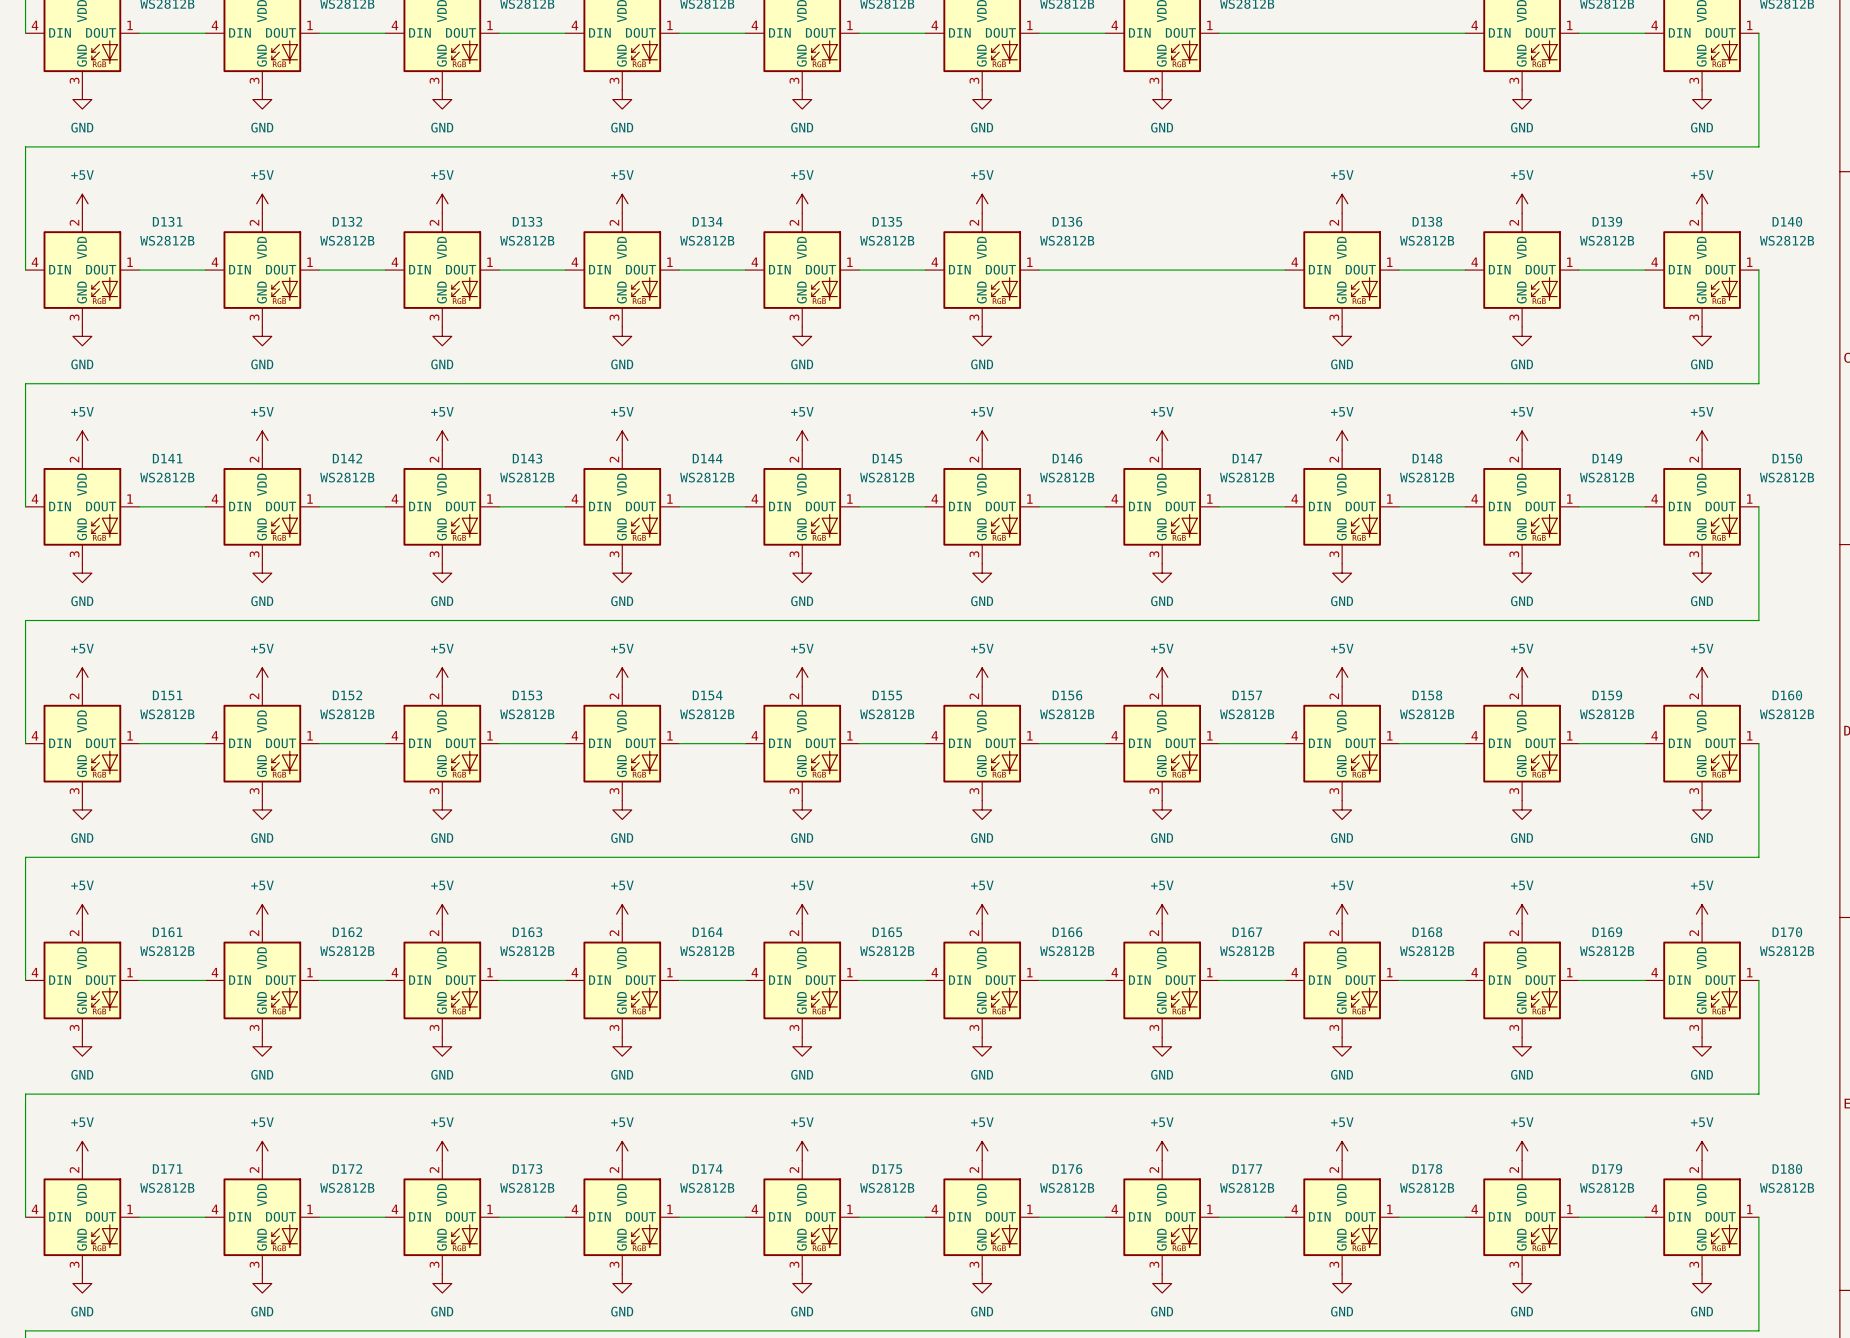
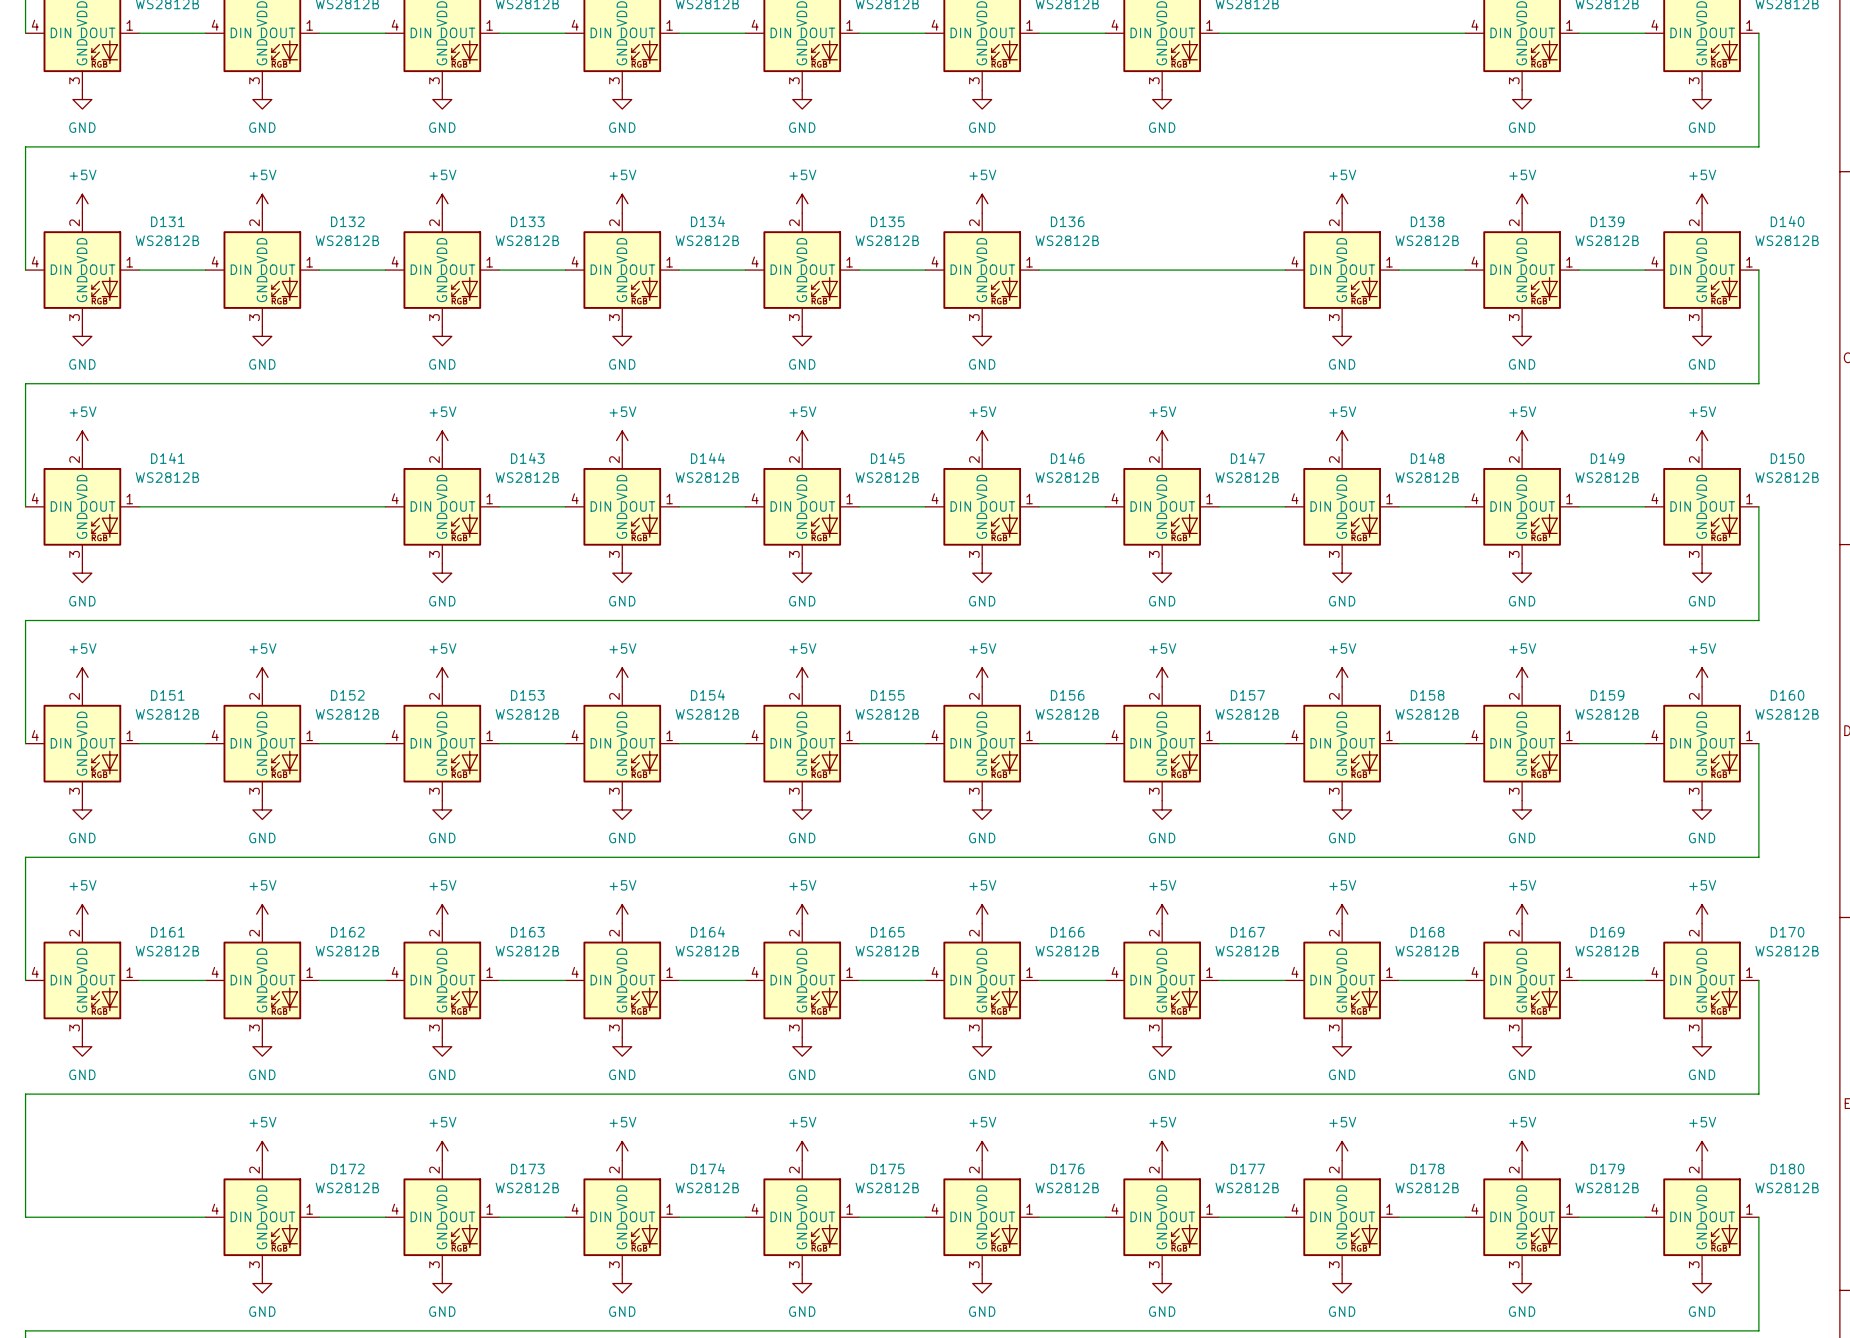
power symbol: +5V (262, 440) -> none
D142: WS2812B (262, 506) -> none
power symbol: GND (262, 573) -> none
power symbol: +5V (82, 1150) -> none
D171: WS2812B (82, 1217) -> none
power symbol: GND (82, 1283) -> none

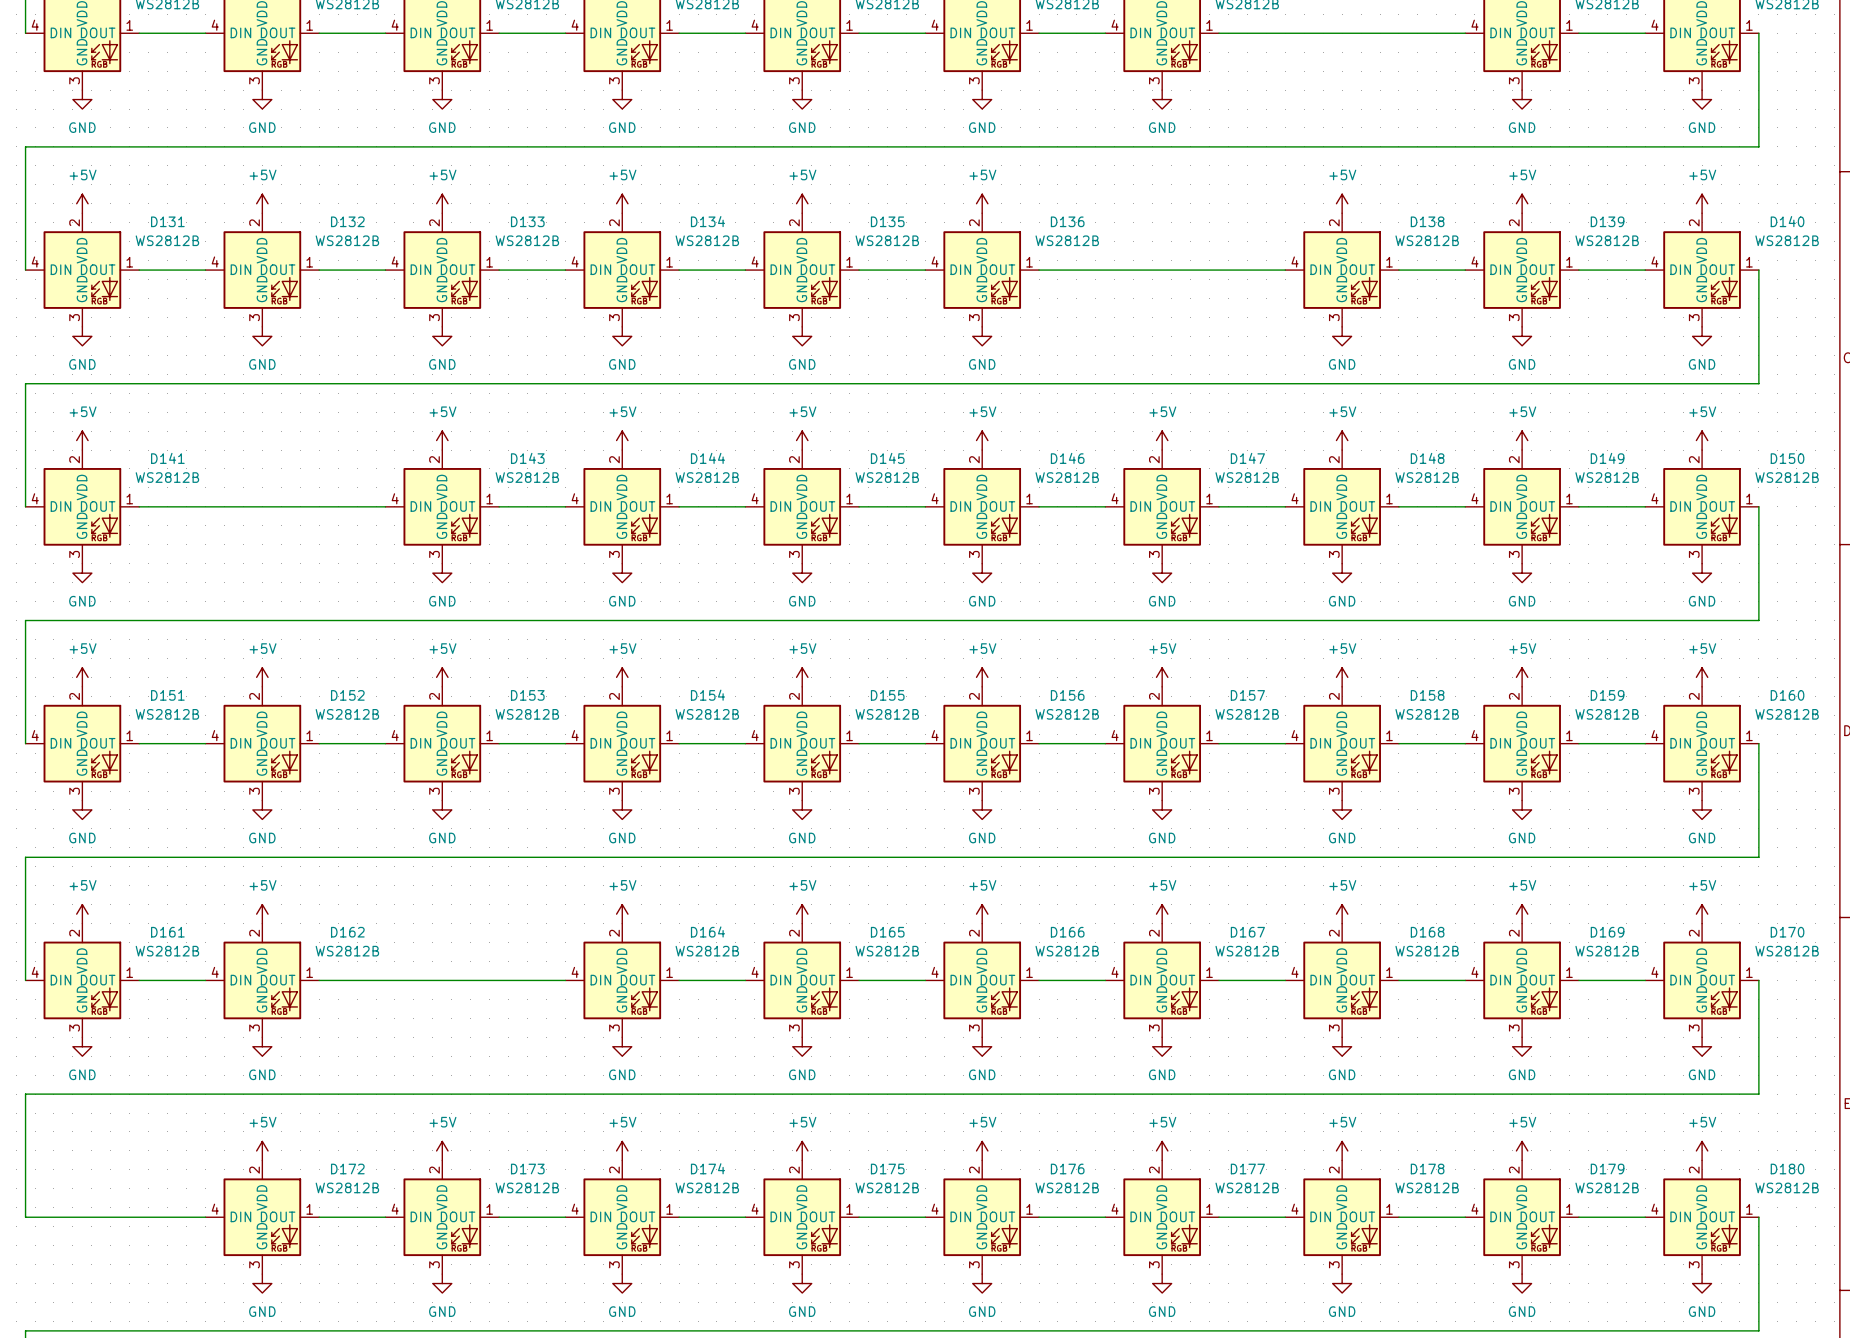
power symbol: +5V (442, 914) -> none
D163: WS2812B (442, 980) -> none
power symbol: GND (442, 1046) -> none

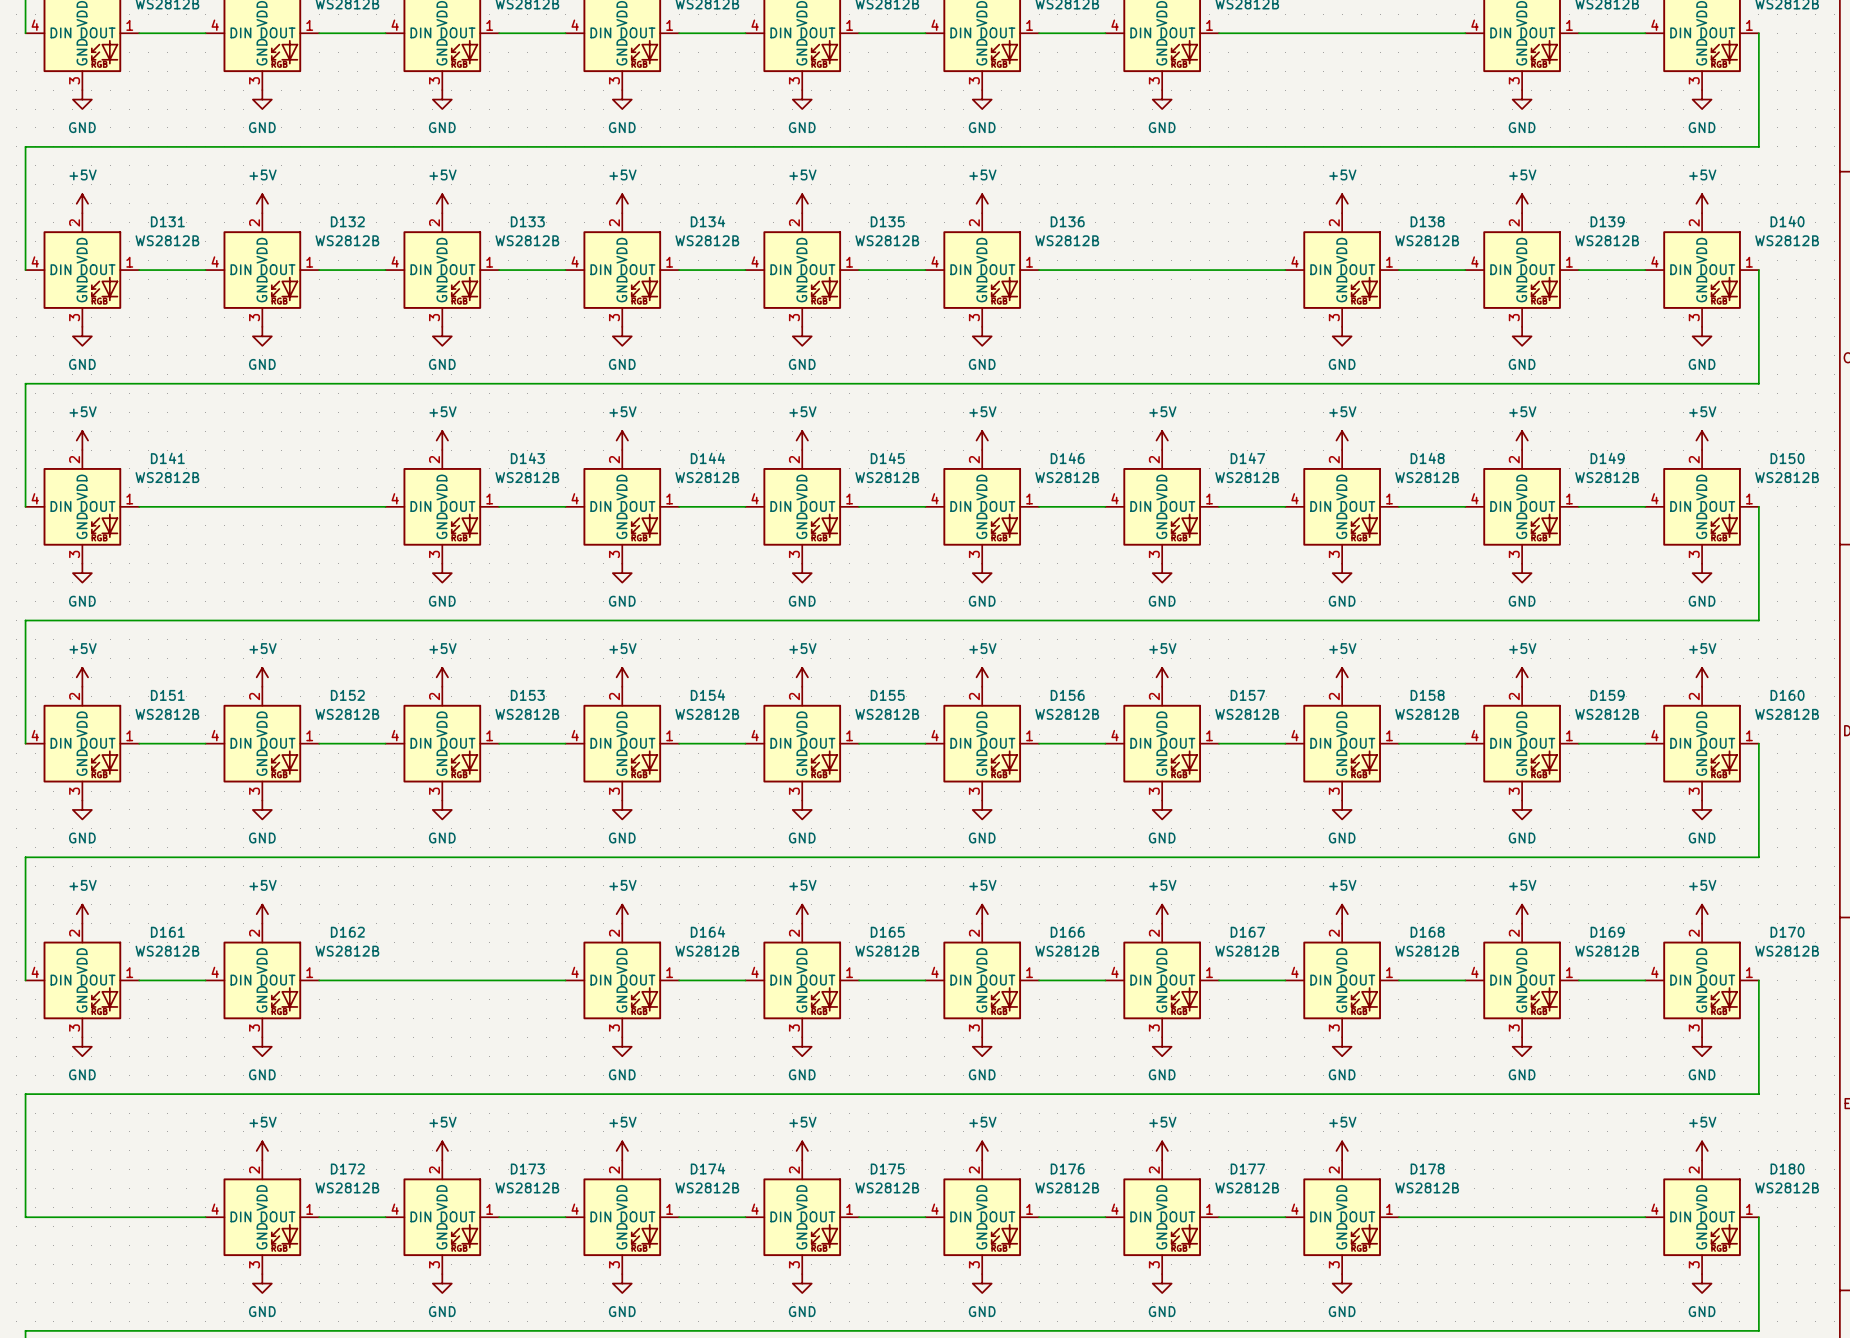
power symbol: +5V (1522, 1150) -> none
D179: WS2812B (1522, 1217) -> none
power symbol: GND (1522, 1283) -> none

